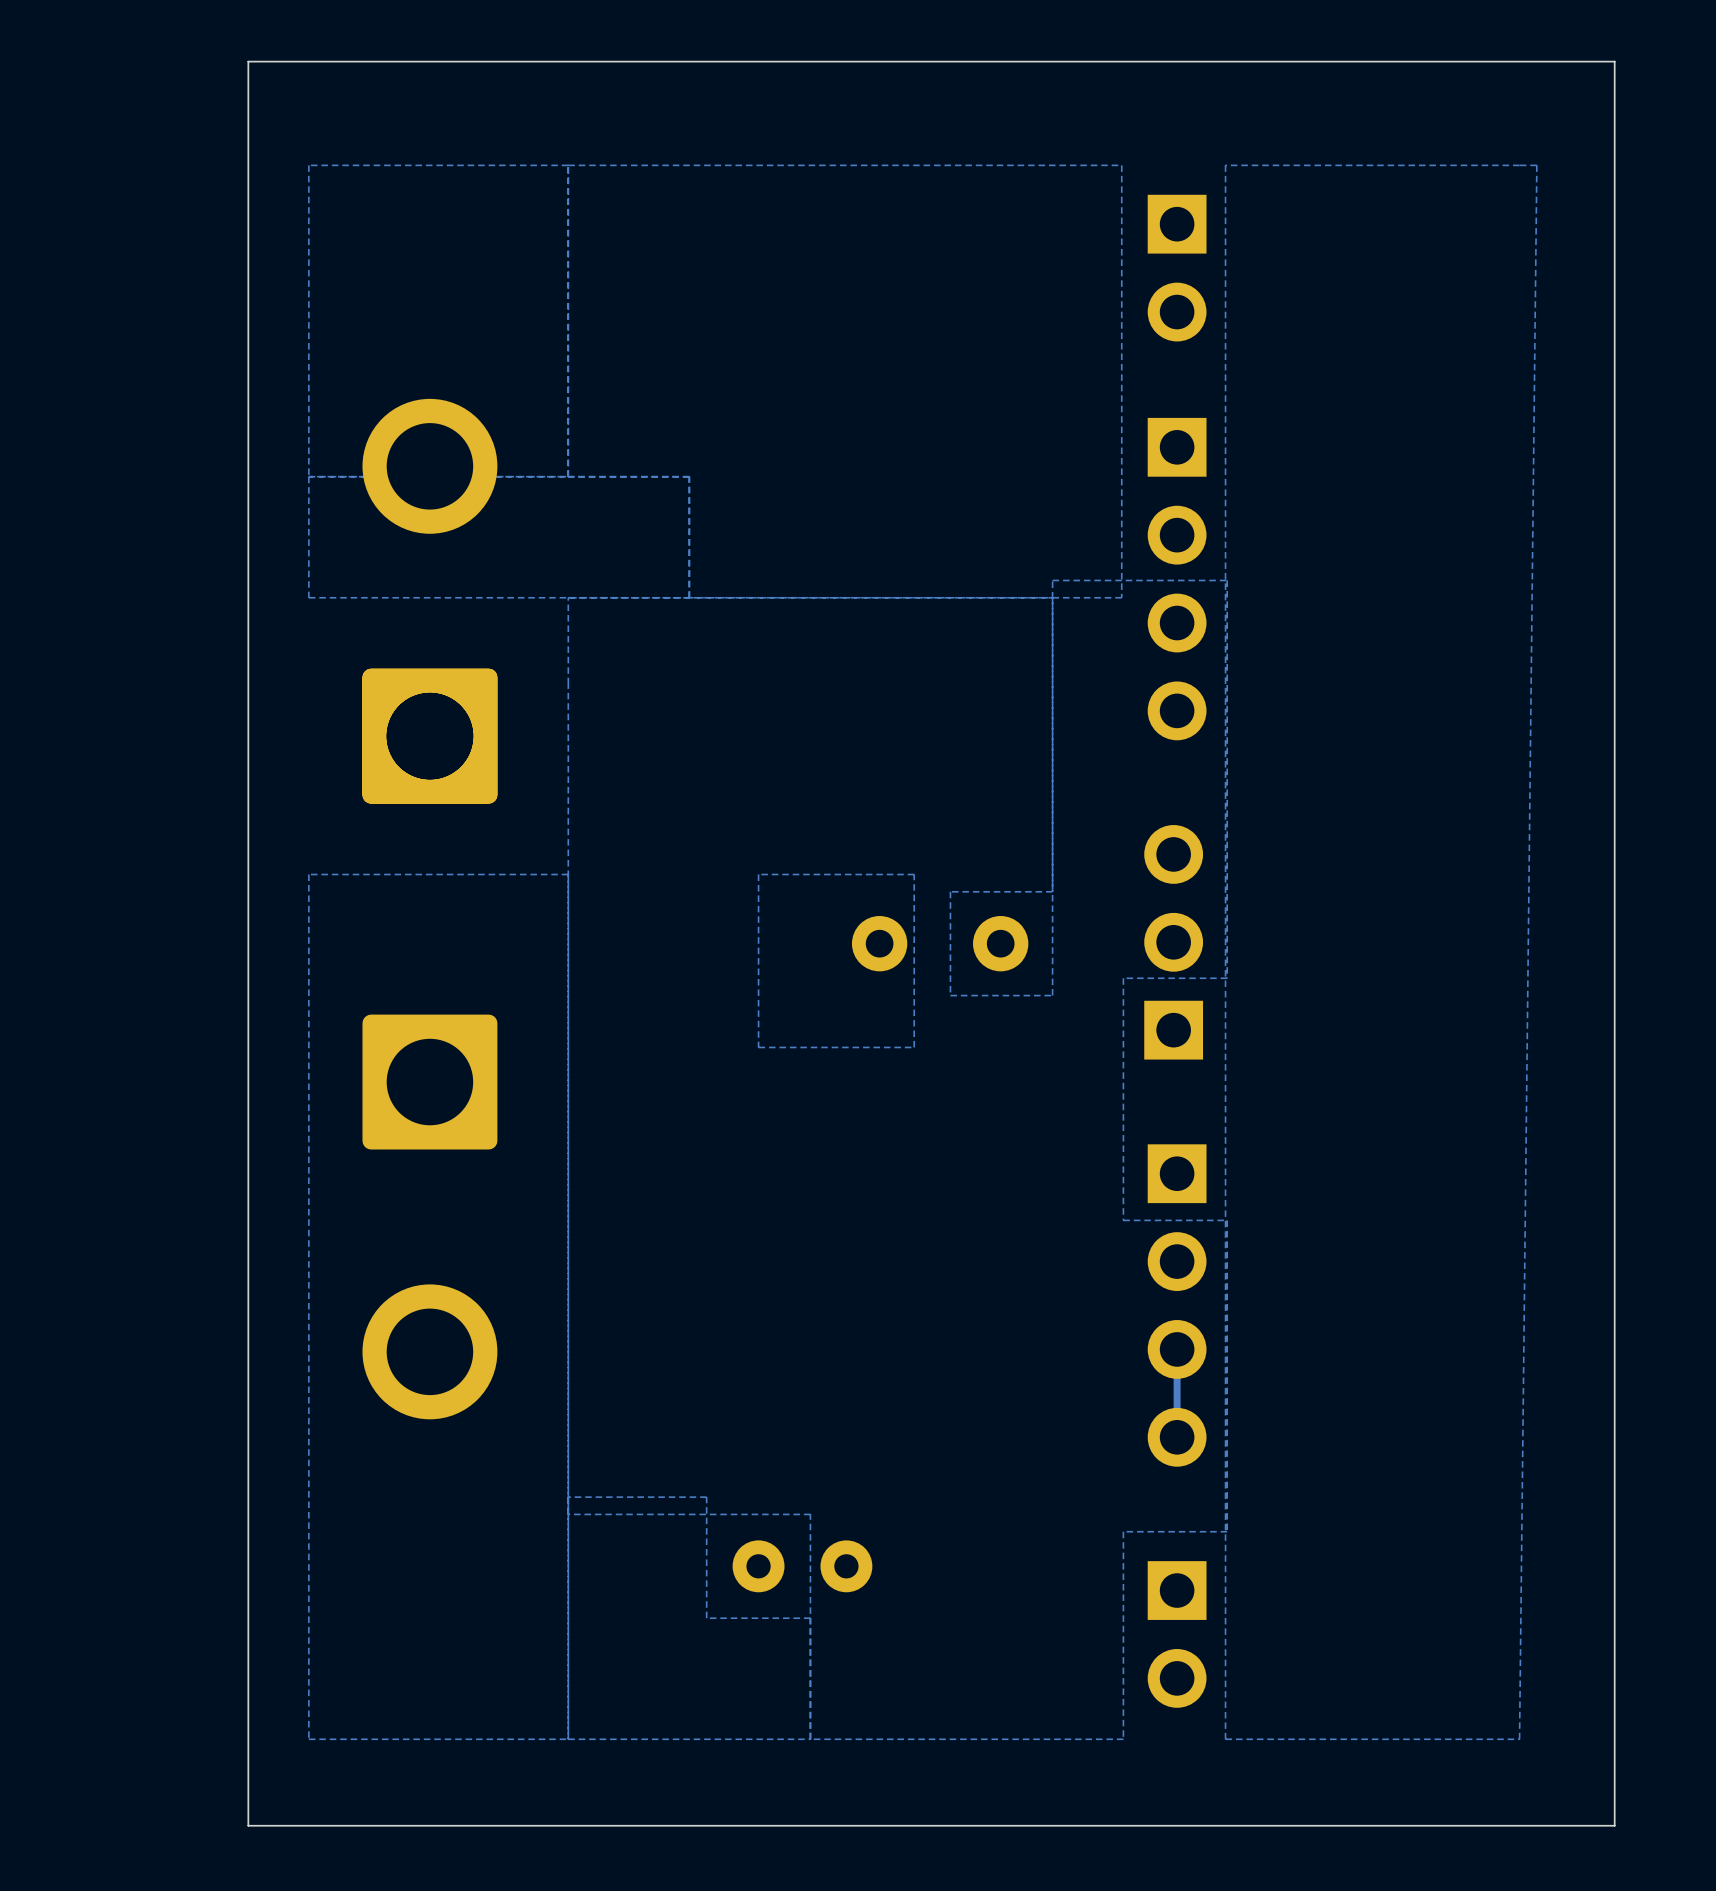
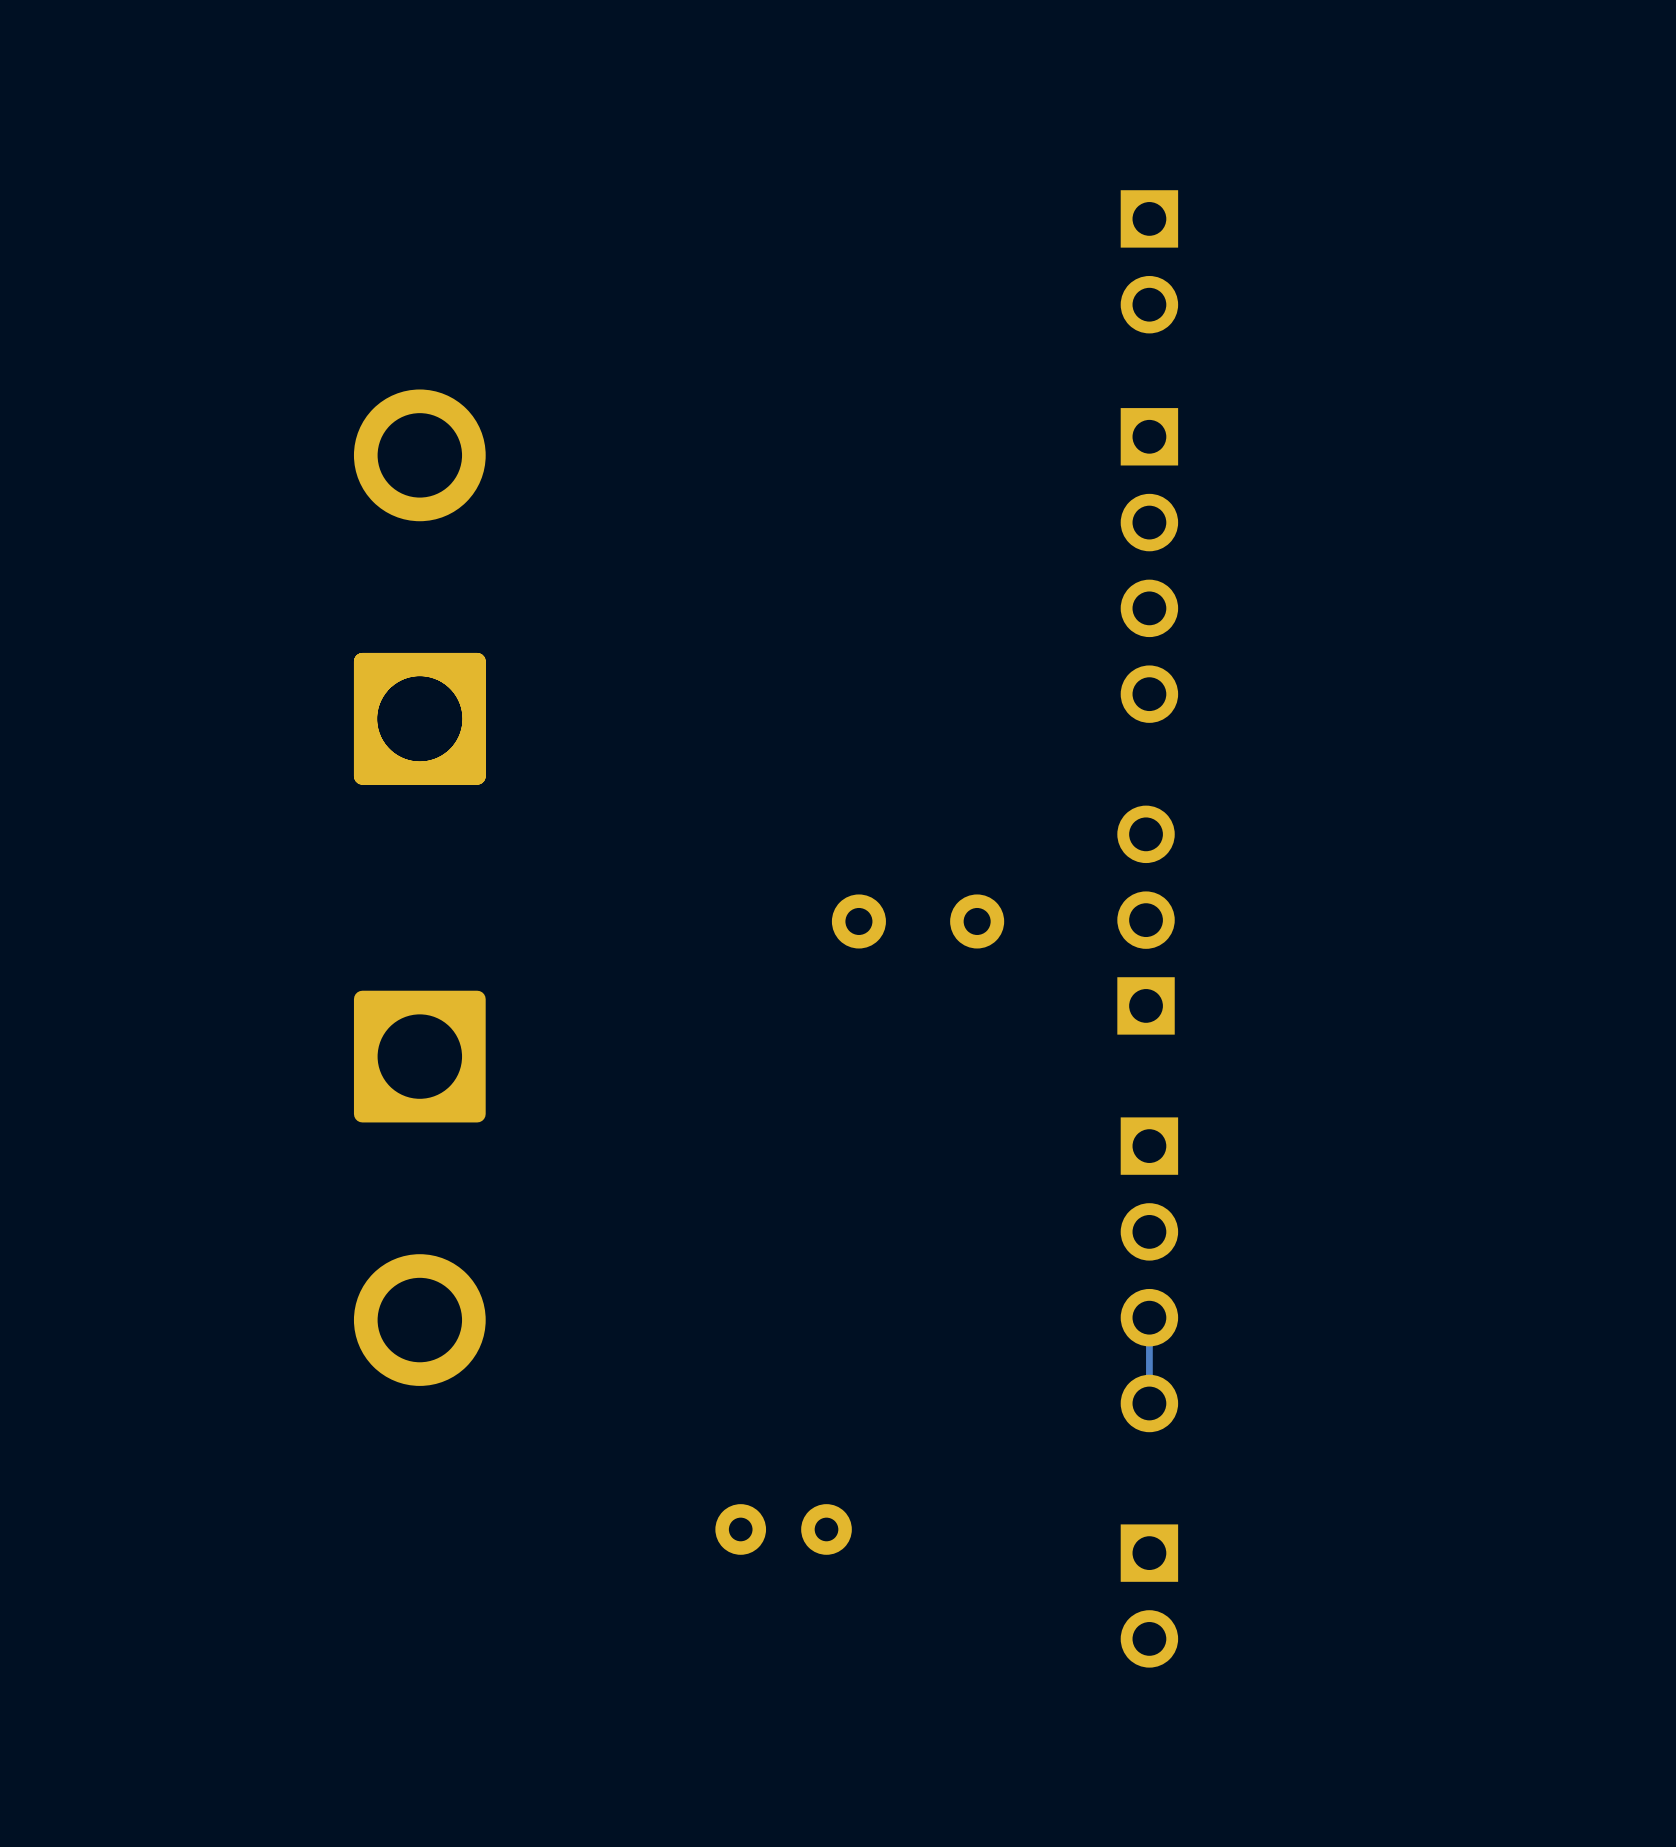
board edge: (1614, 61) (248, 61) (248, 1825) (1614, 1825) (1614, 61) -> none
zone outline: (568, 165) (568, 476) -> none
zone outline: (1121, 165) (1121, 597) (308, 597) (308, 165) (1121, 165) -> none
zone outline: (1536, 165) (1225, 165) (1225, 1739) (1519, 1739) (1536, 165) -> none
zone outline: (308, 476) (689, 476) (689, 597) -> none
zone outline: (568, 597) (568, 1739) -> none
zone outline: (568, 874) (308, 874) (308, 1739) (1123, 1739) (1123, 1531) (1227, 1531) (1227, 1220) (1123, 1220) (1123, 978) (1227, 978) (1227, 580) (1052, 580) (1052, 995) (950, 995) (950, 891) (1052, 891) -> none
zone outline: (914, 874) (758, 874) (758, 1047) (914, 1047) (914, 874) -> none
zone outline: (568, 1497) (706, 1497) (706, 1618) (810, 1618) -> none
zone outline: (568, 1514) (810, 1514) (810, 1739) -> none

